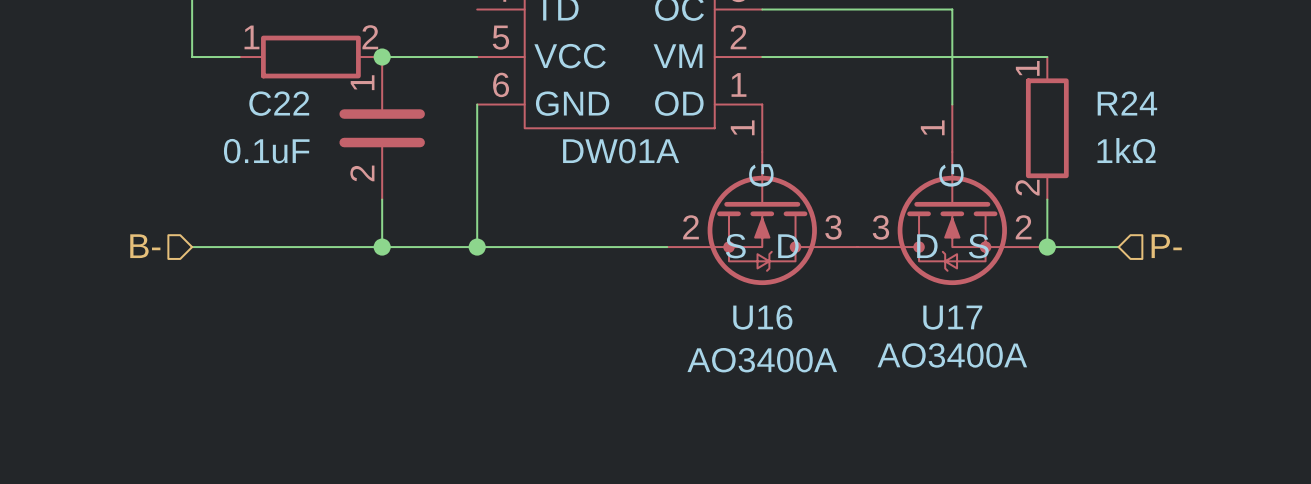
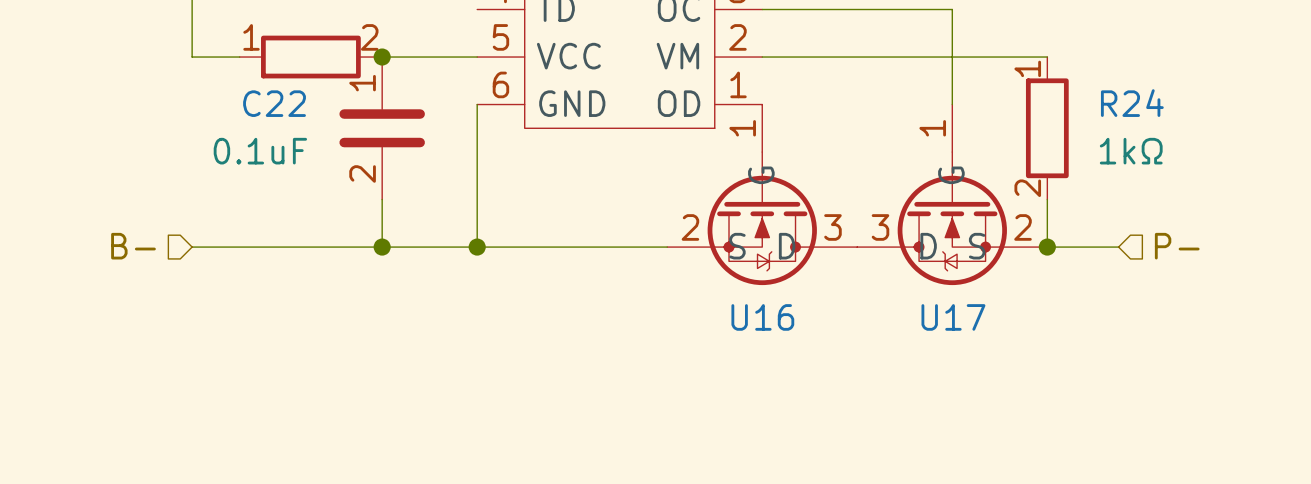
part value: DW01A (621, 151) -> none
U17 value: AO3400A (952, 355) -> none
U16 value: AO3400A (762, 360) -> none

